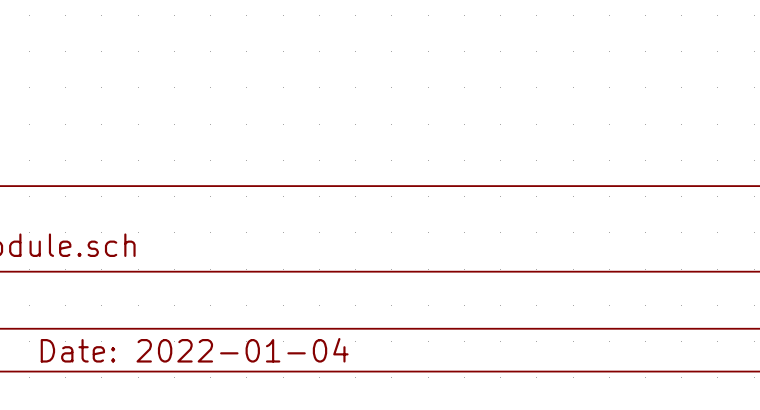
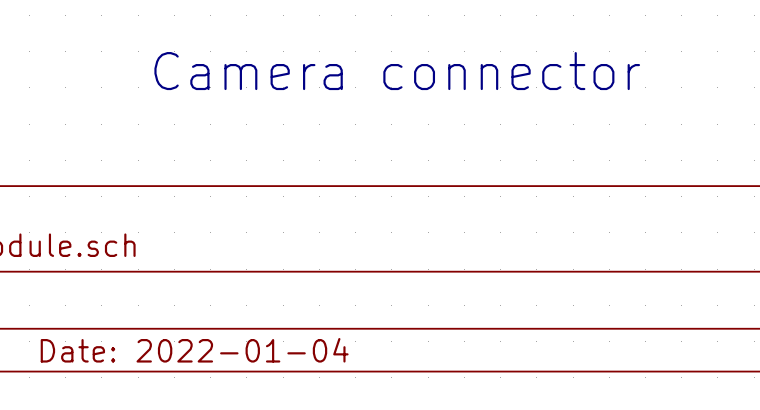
text: none -> Camera connector (397, 71)

